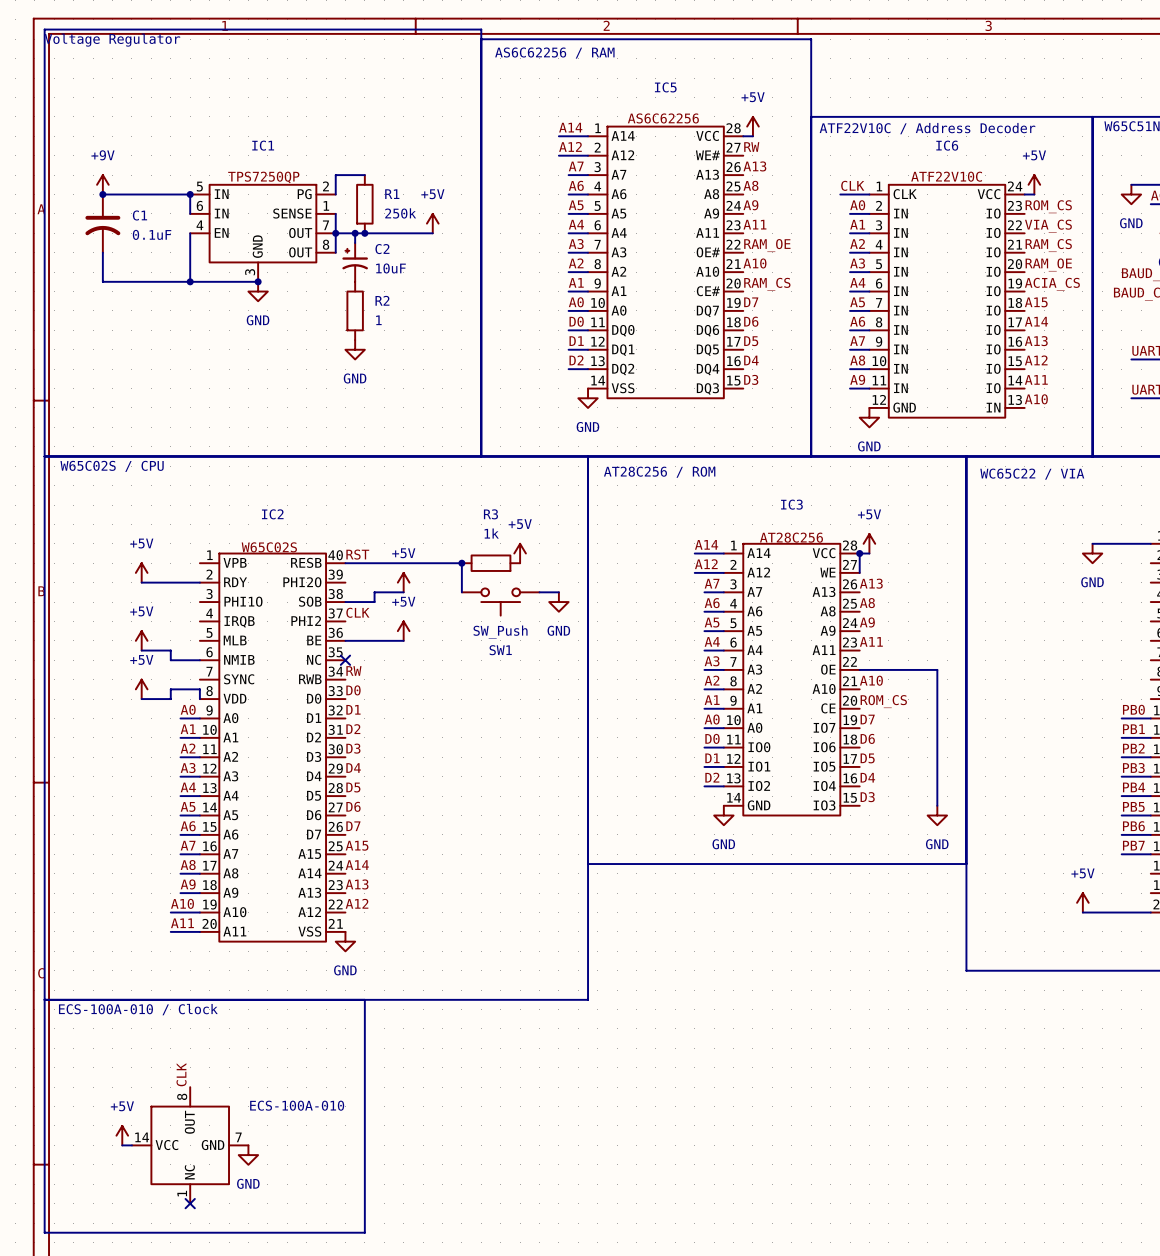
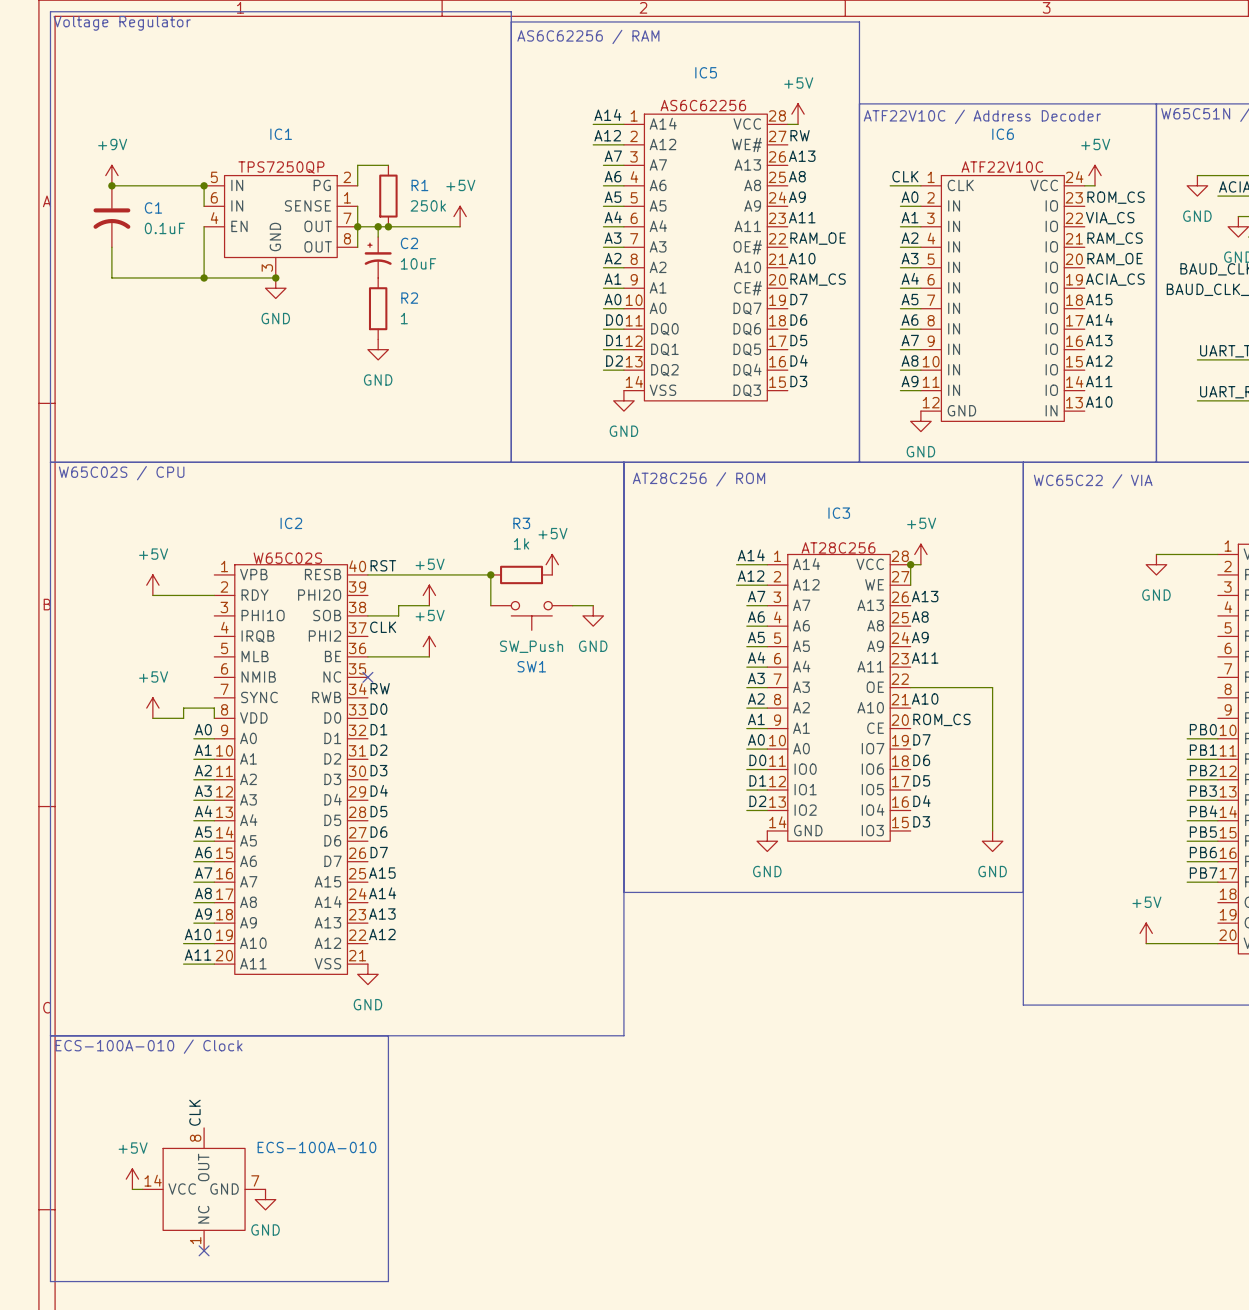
power symbol: +5V (141, 640) -> none
wire: (141, 650) (170, 650) (170, 660) (199, 660) -> none

